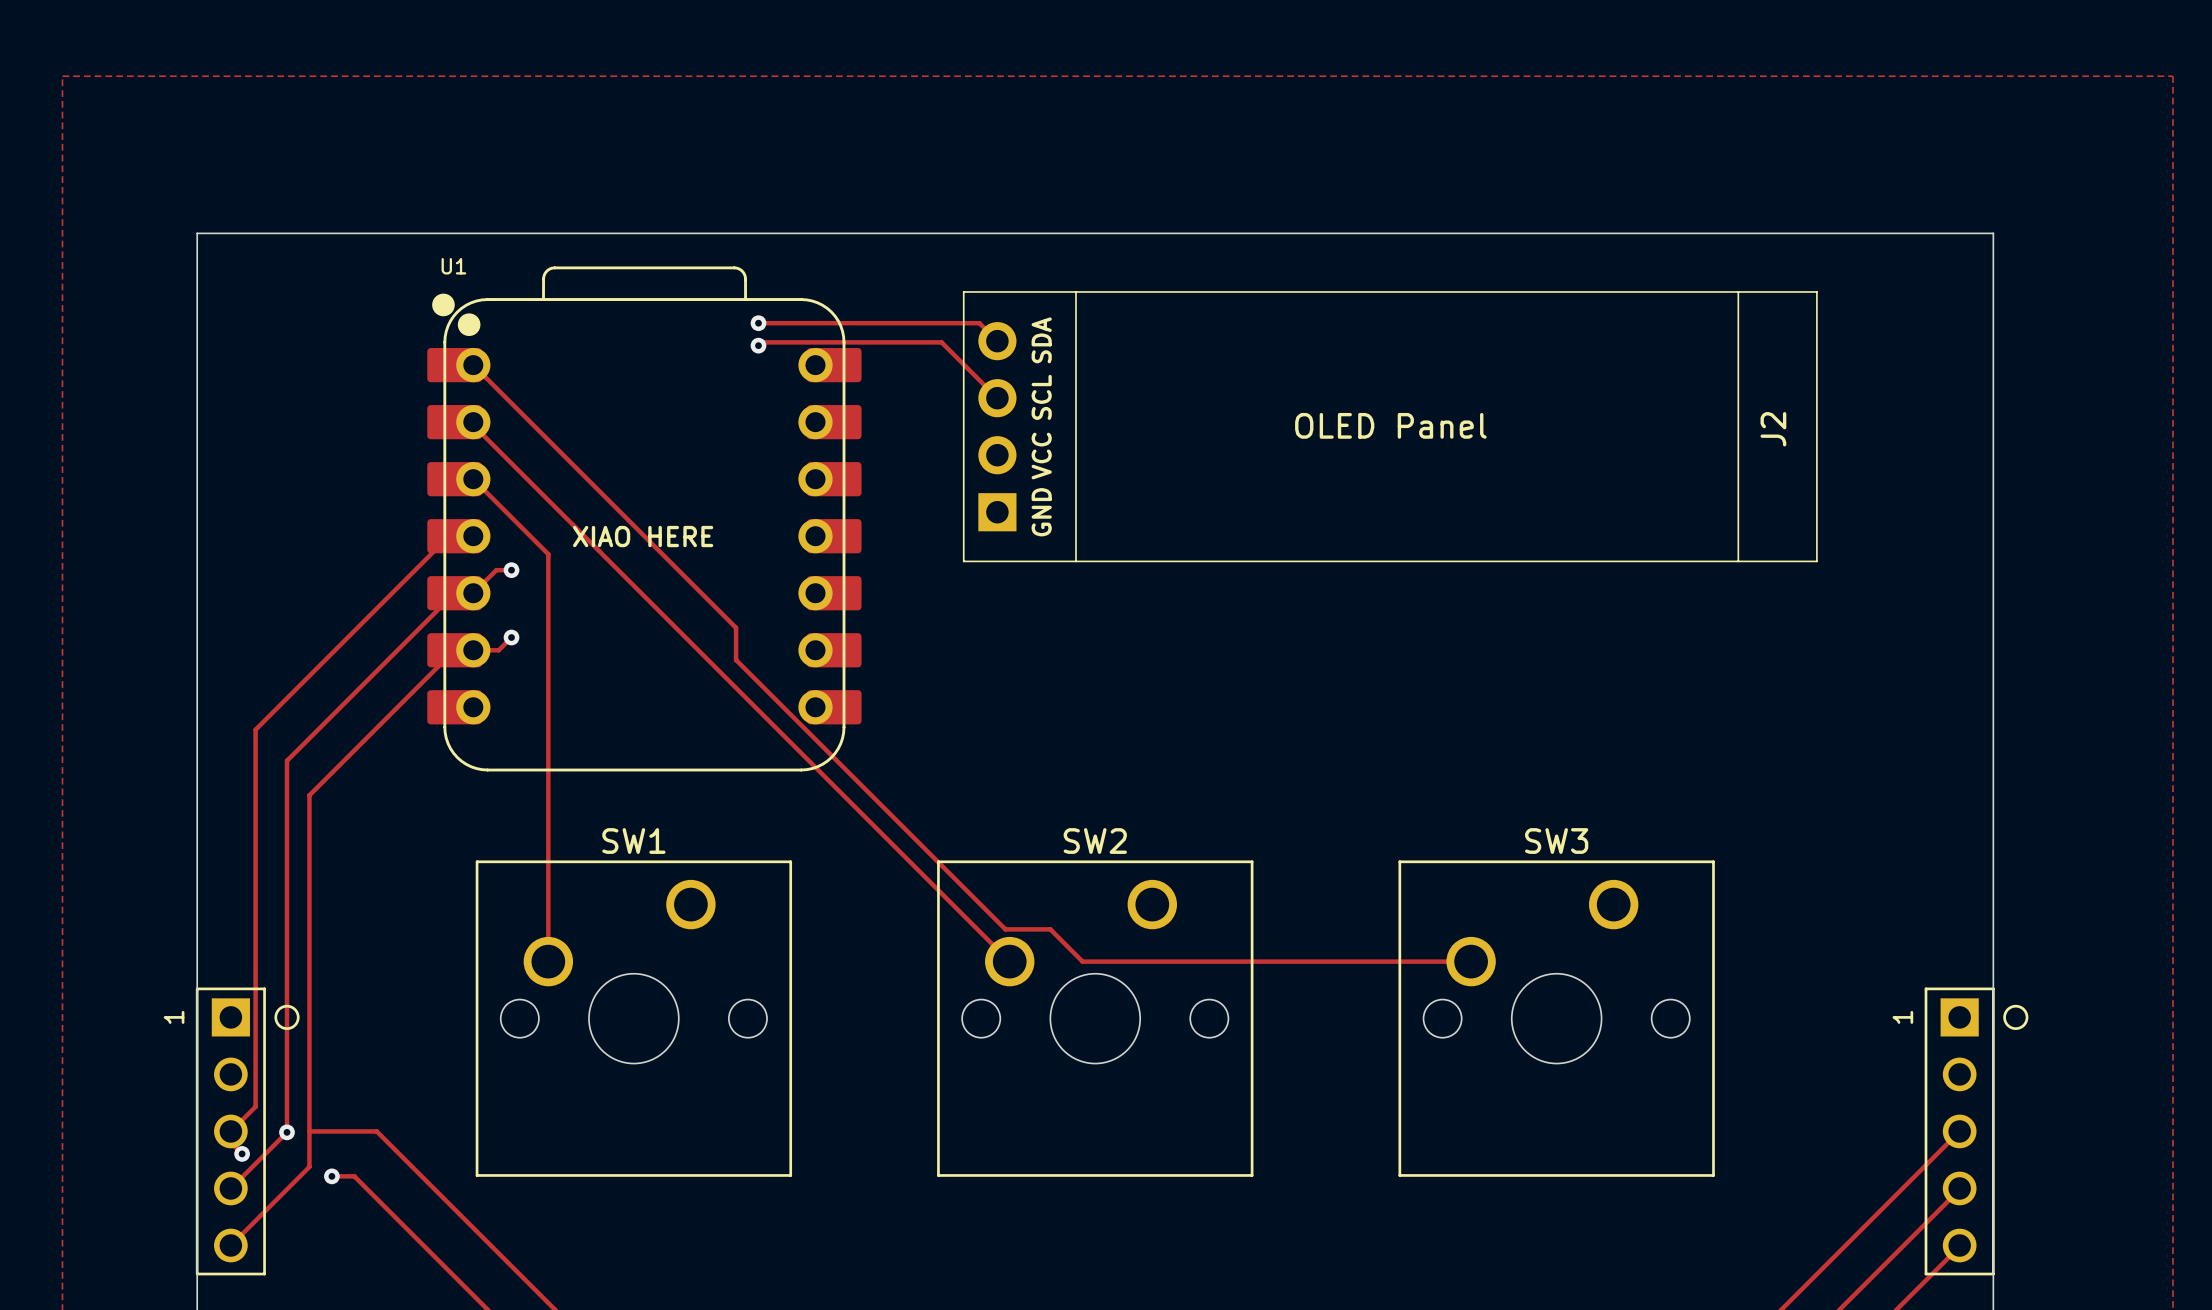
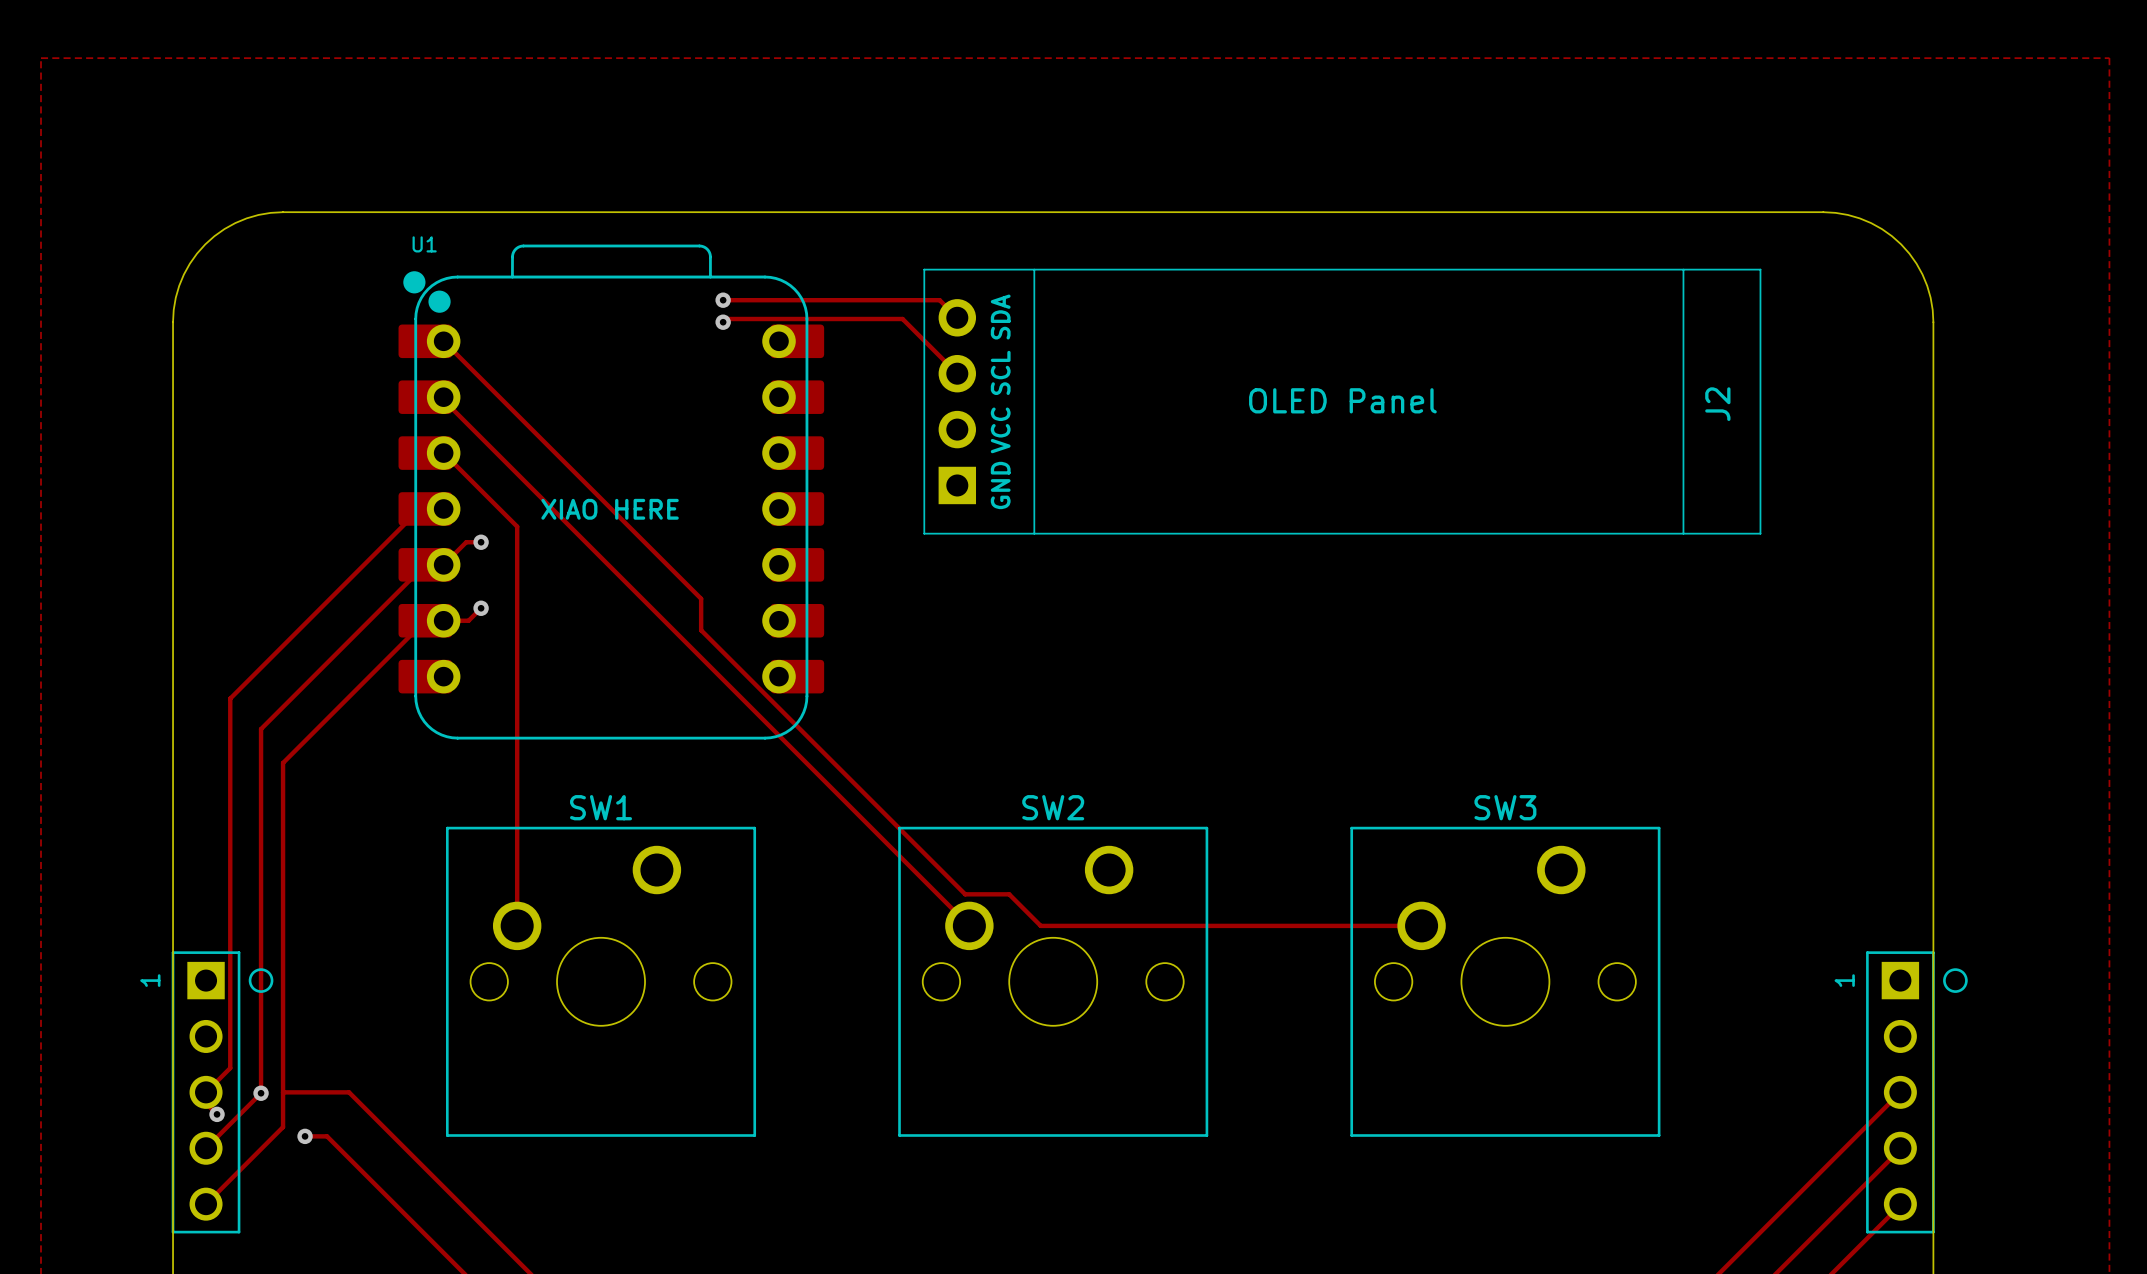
board edge: (309, 233) (197, 233) (197, 345) -> (283, 212) (246, 218) (224, 229) (205, 244) (189, 263) (179, 285) (173, 322)
board edge: (1881, 233) (1993, 233) (1993, 345) -> (1823, 212) (1859, 218) (1881, 229) (1901, 244) (1916, 263) (1927, 285) (1933, 322)

